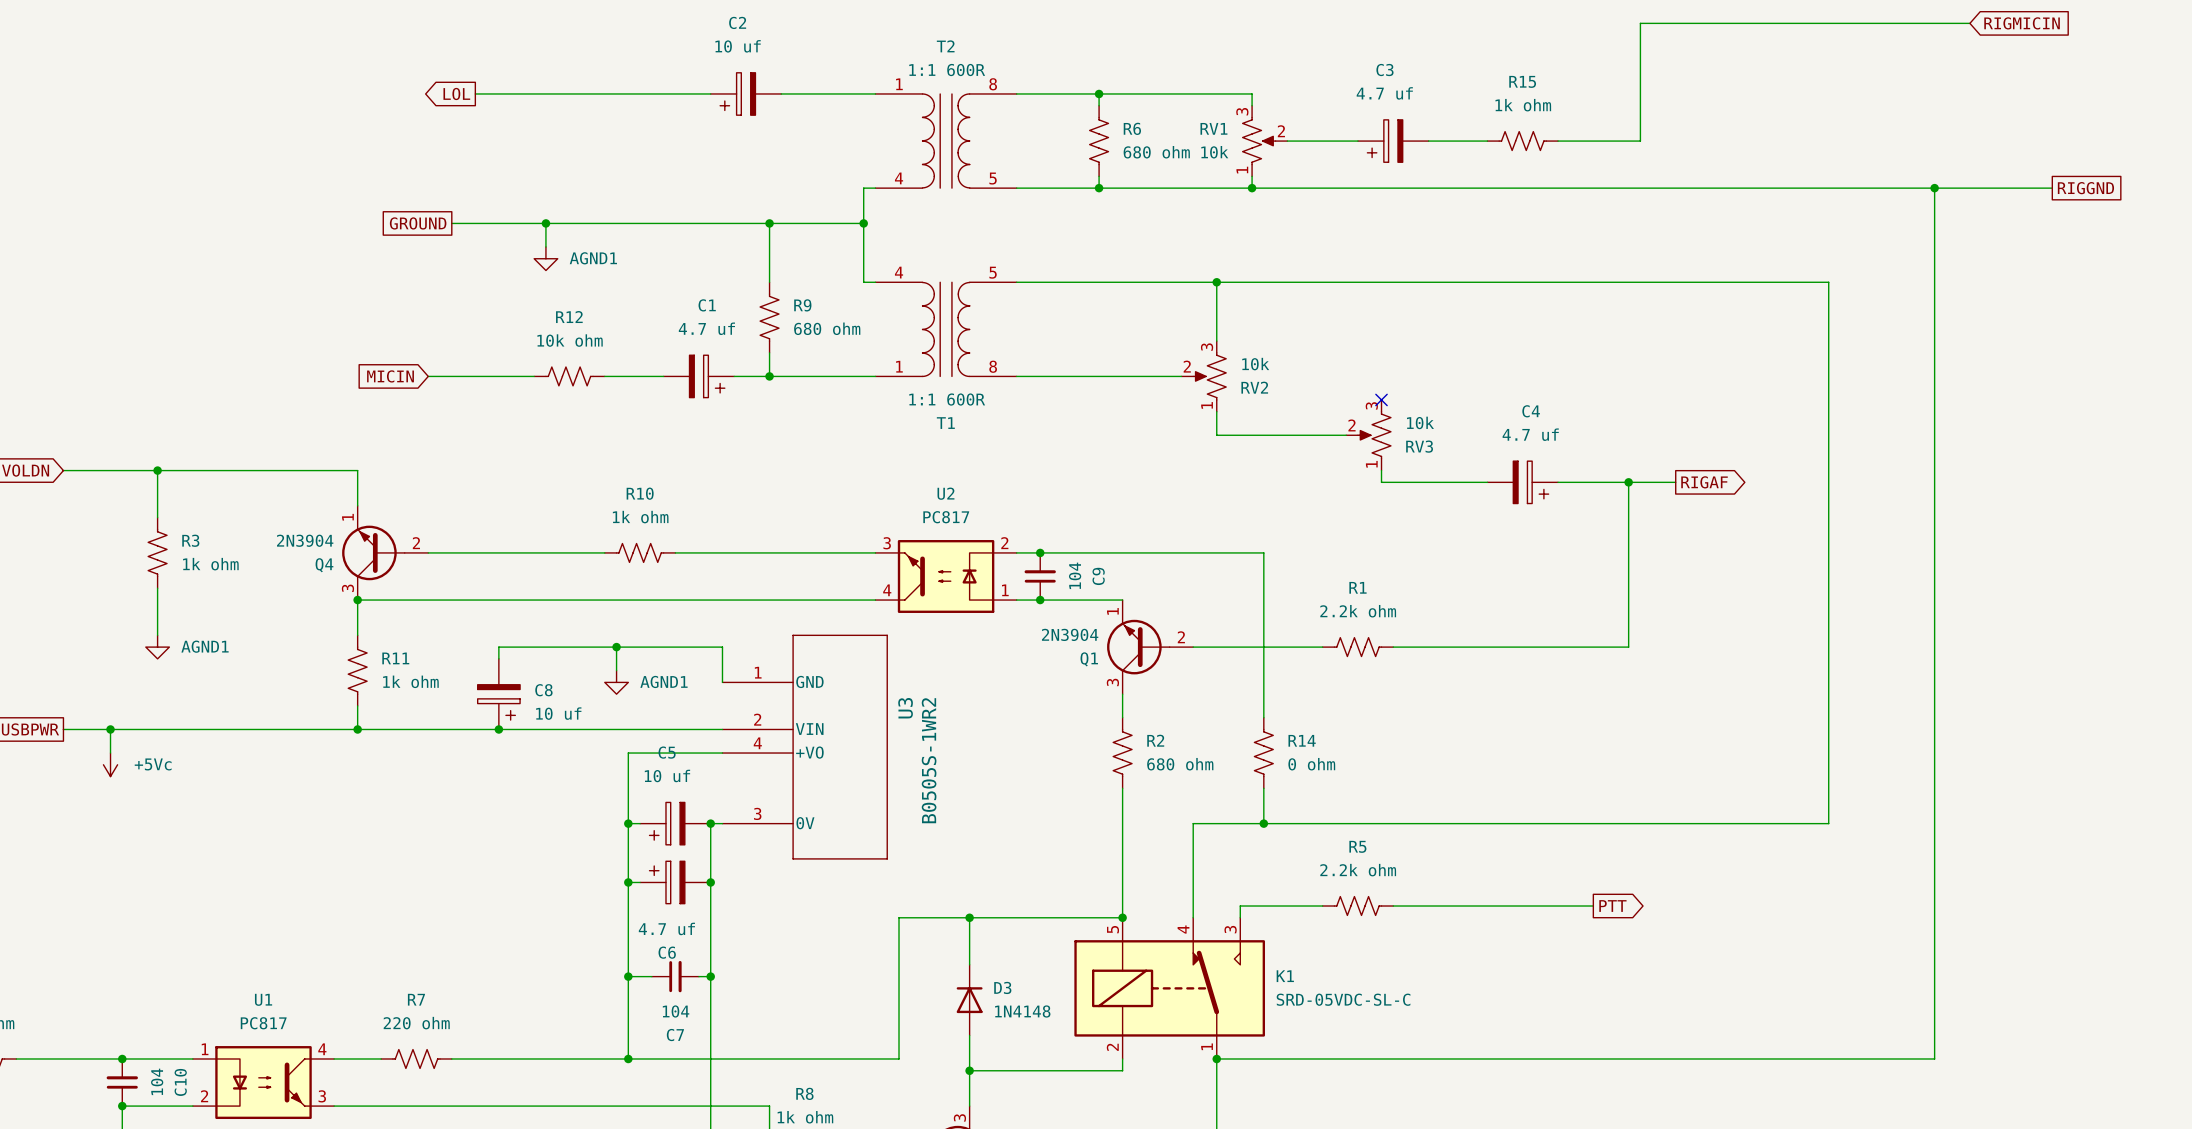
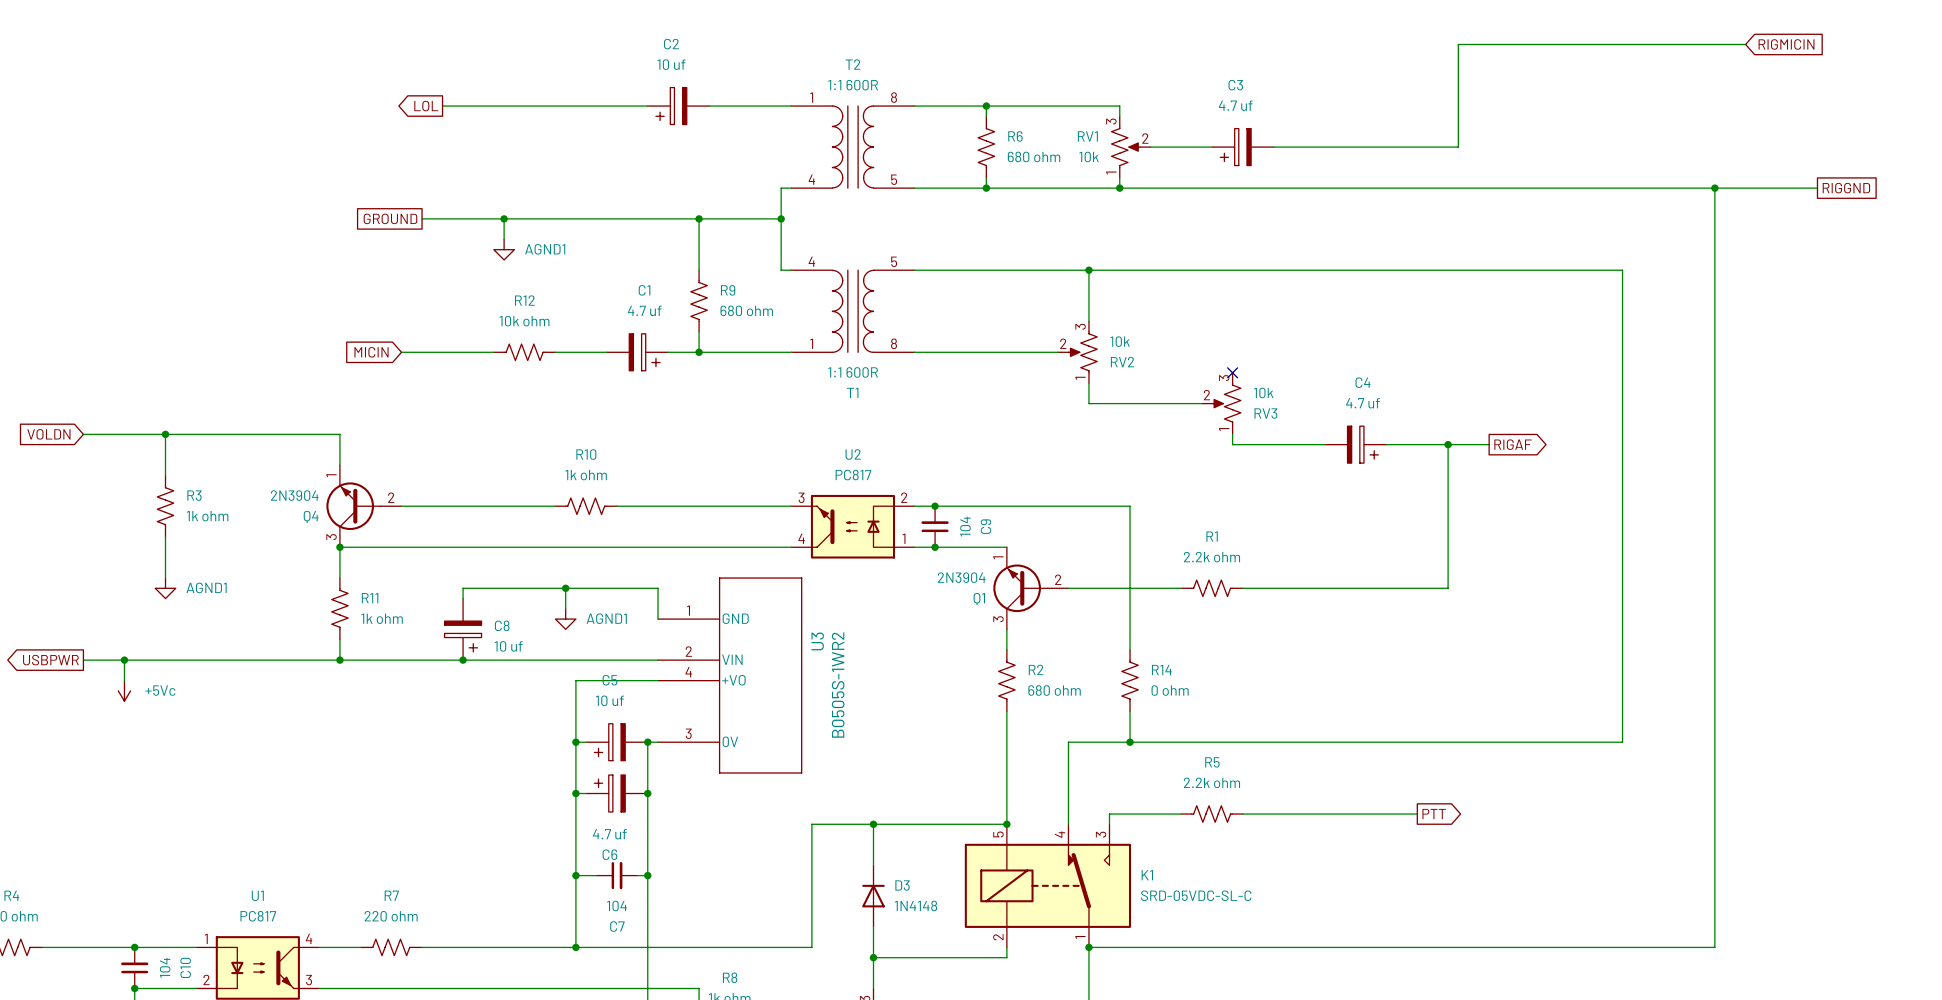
R15: 1k ohm (1522, 141) -> none

